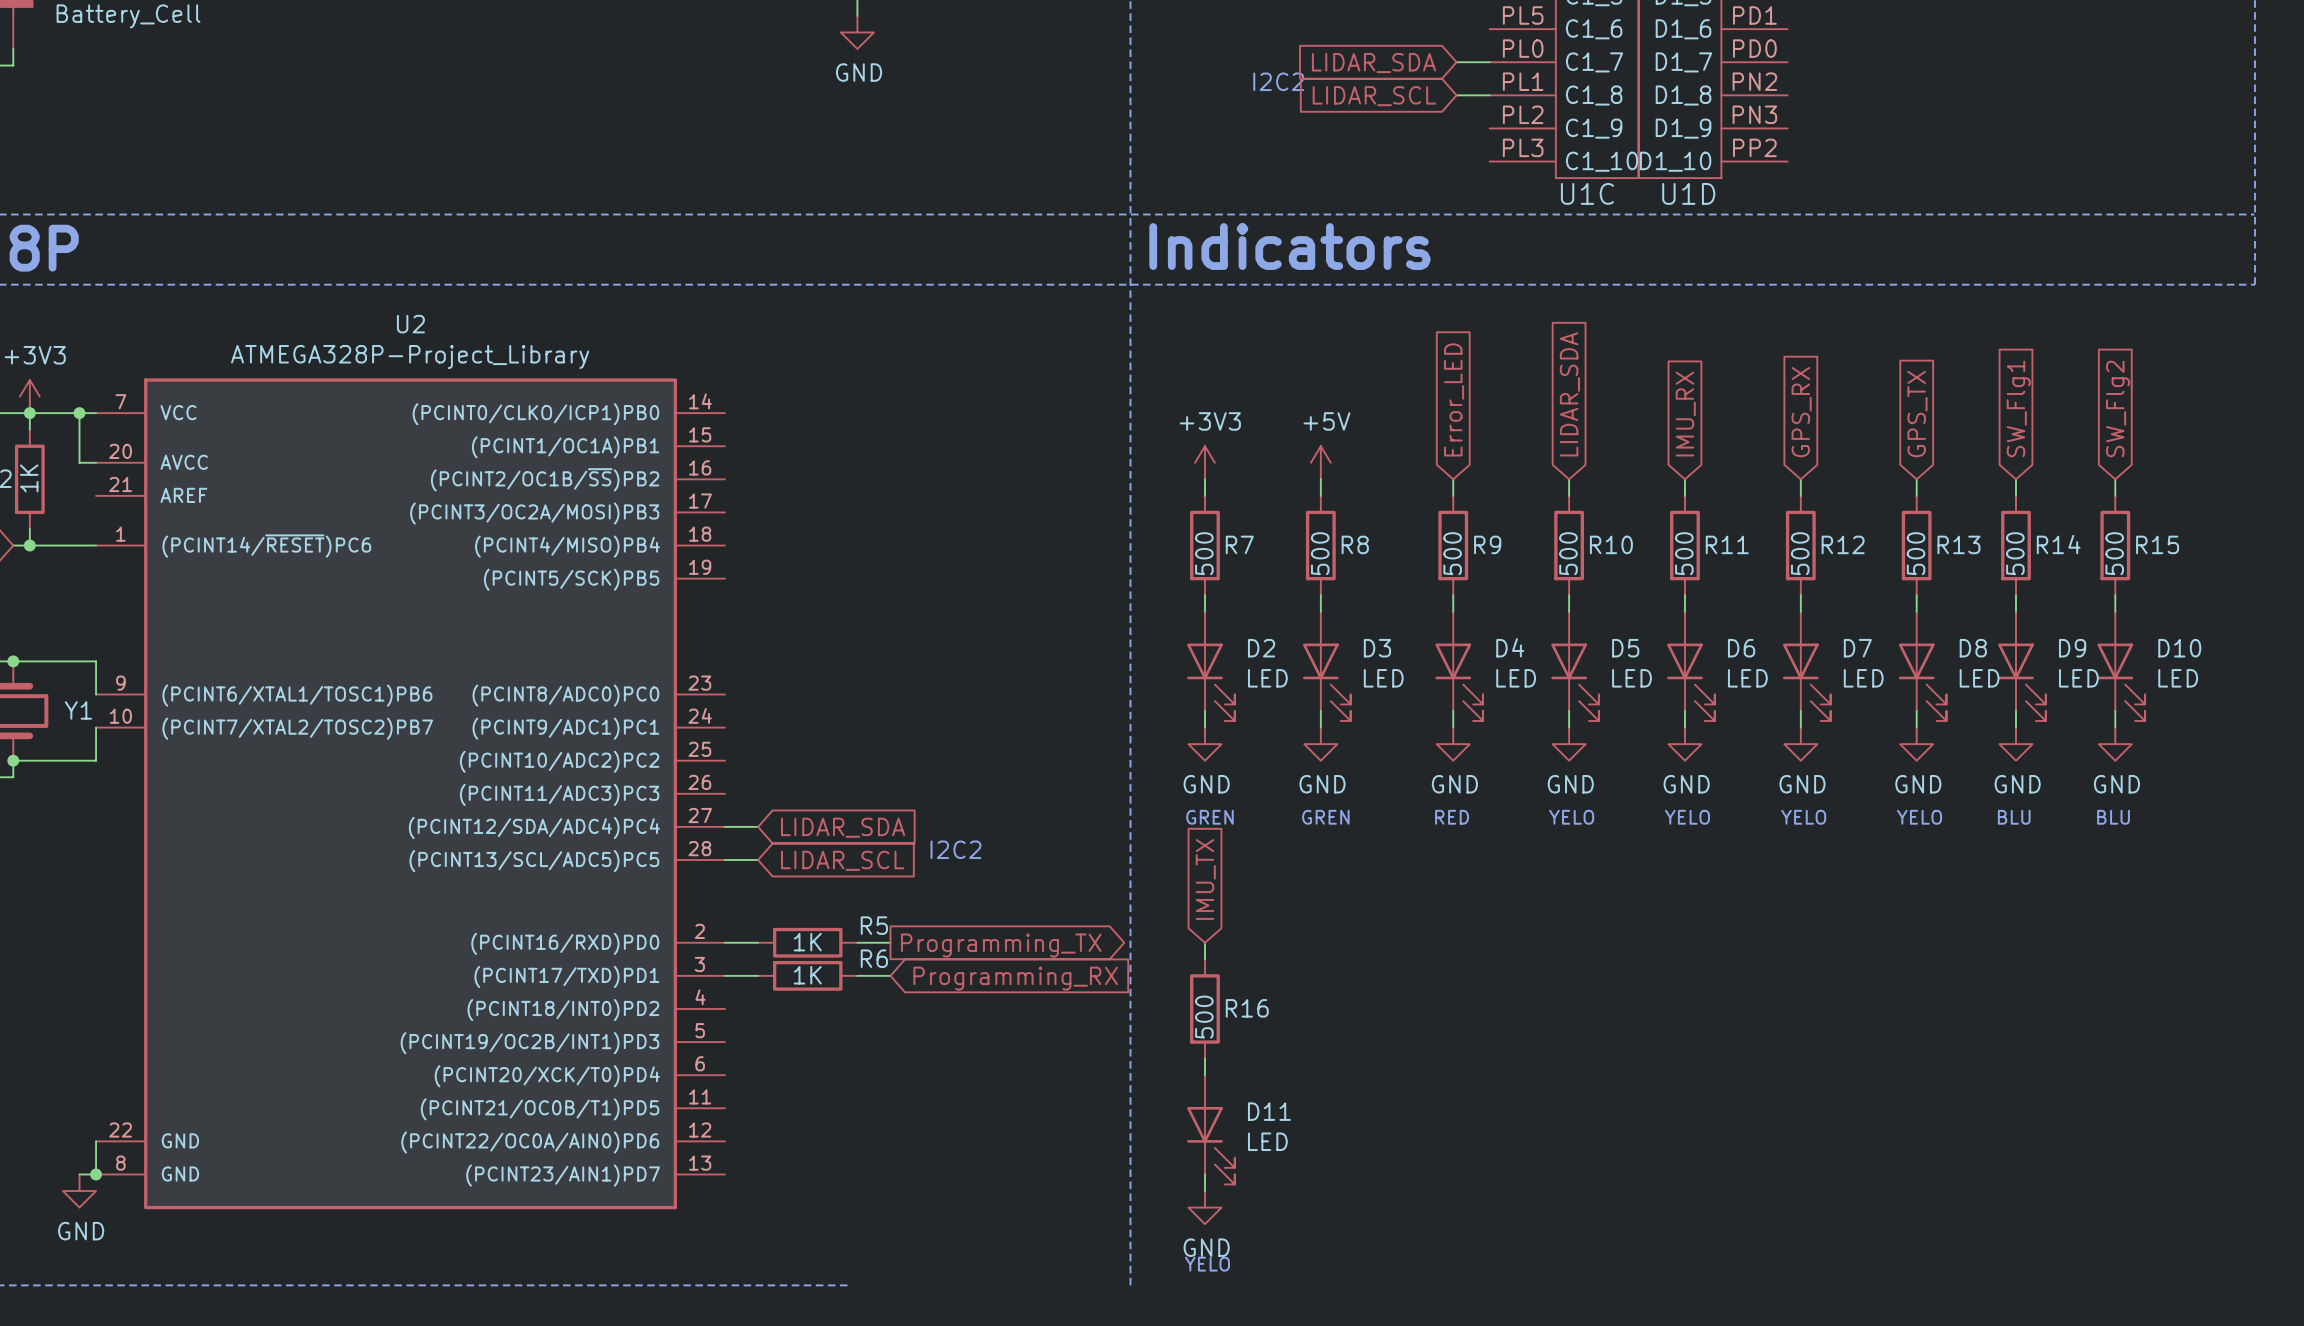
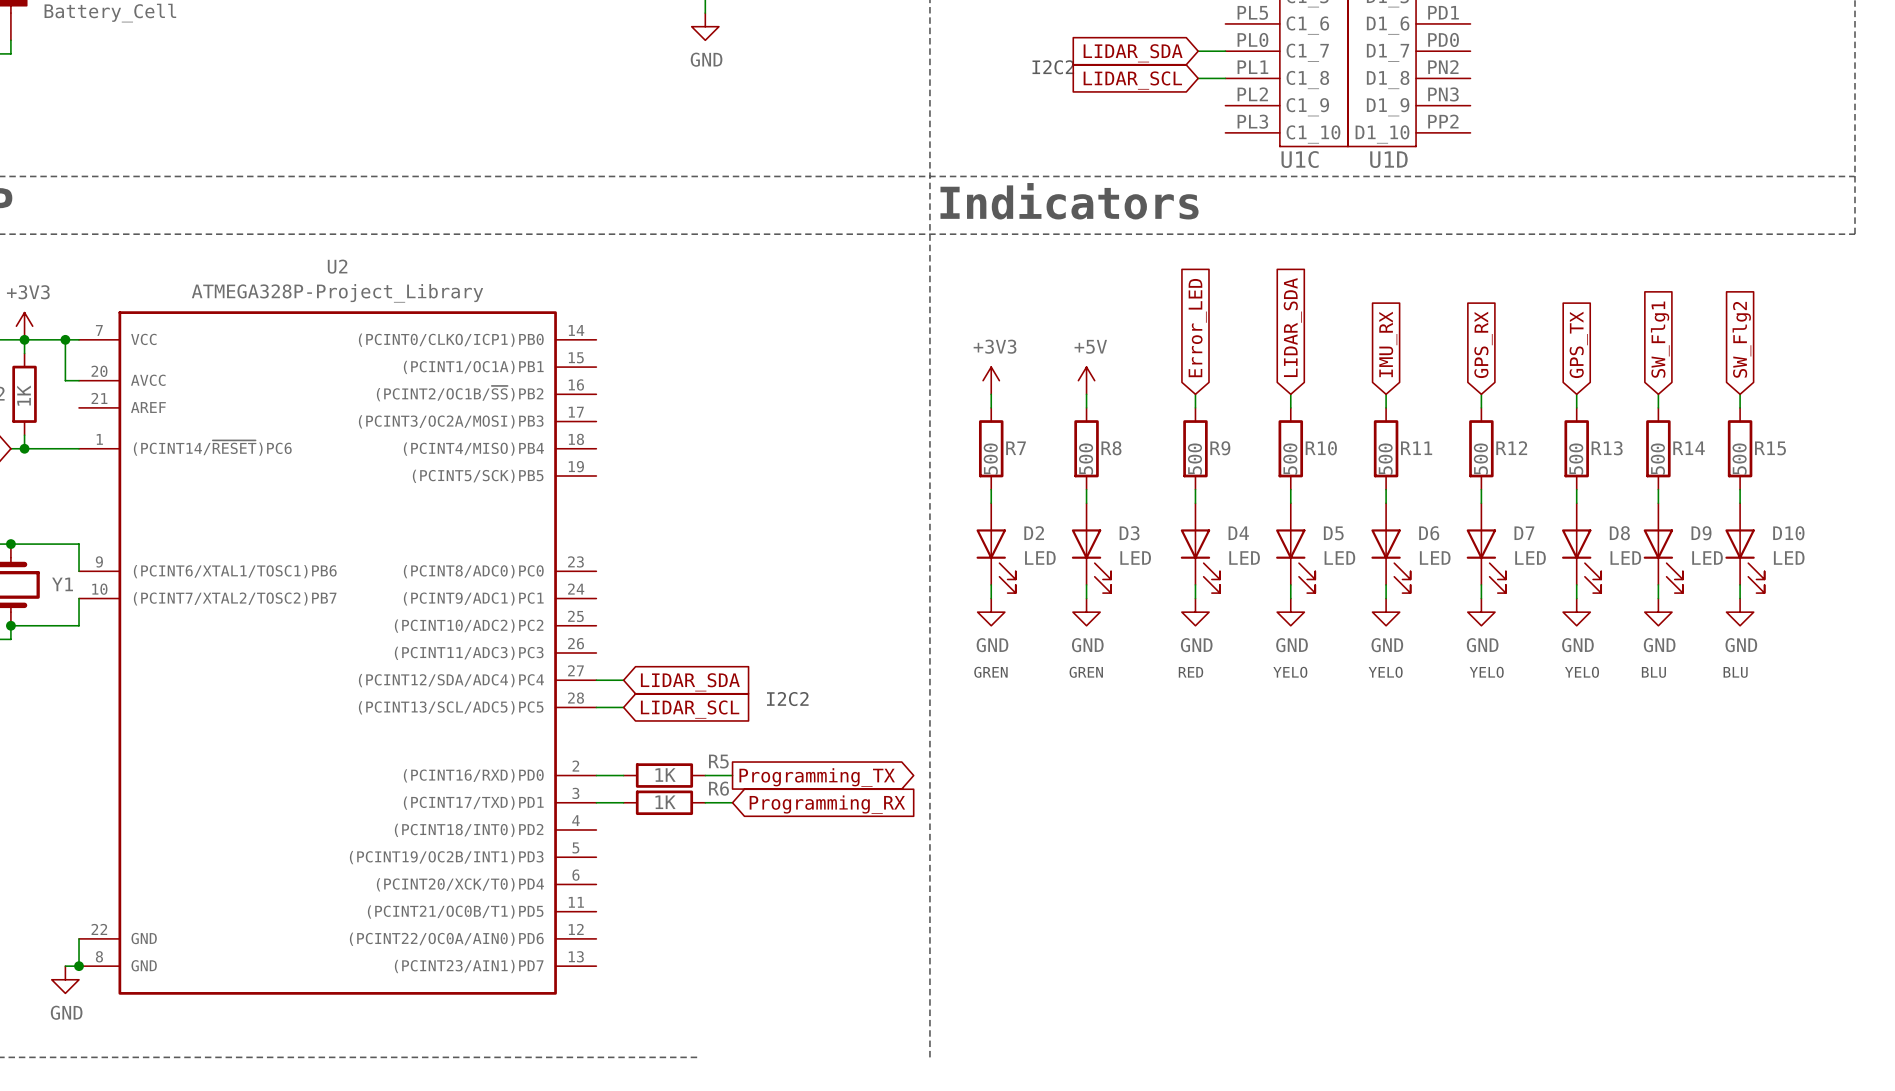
global label: IMU_TX (1205, 879) -> none
wire: (1204, 942) (1204, 959) -> none
R16: 500 (1204, 1008) -> none
wire: (1204, 1058) (1204, 1075) -> none
D11: LED (1210, 1129) -> none
wire: (1204, 1174) (1204, 1191) -> none
power symbol: GND (1204, 1207) -> none
text: YELO (1207, 1264) -> none

